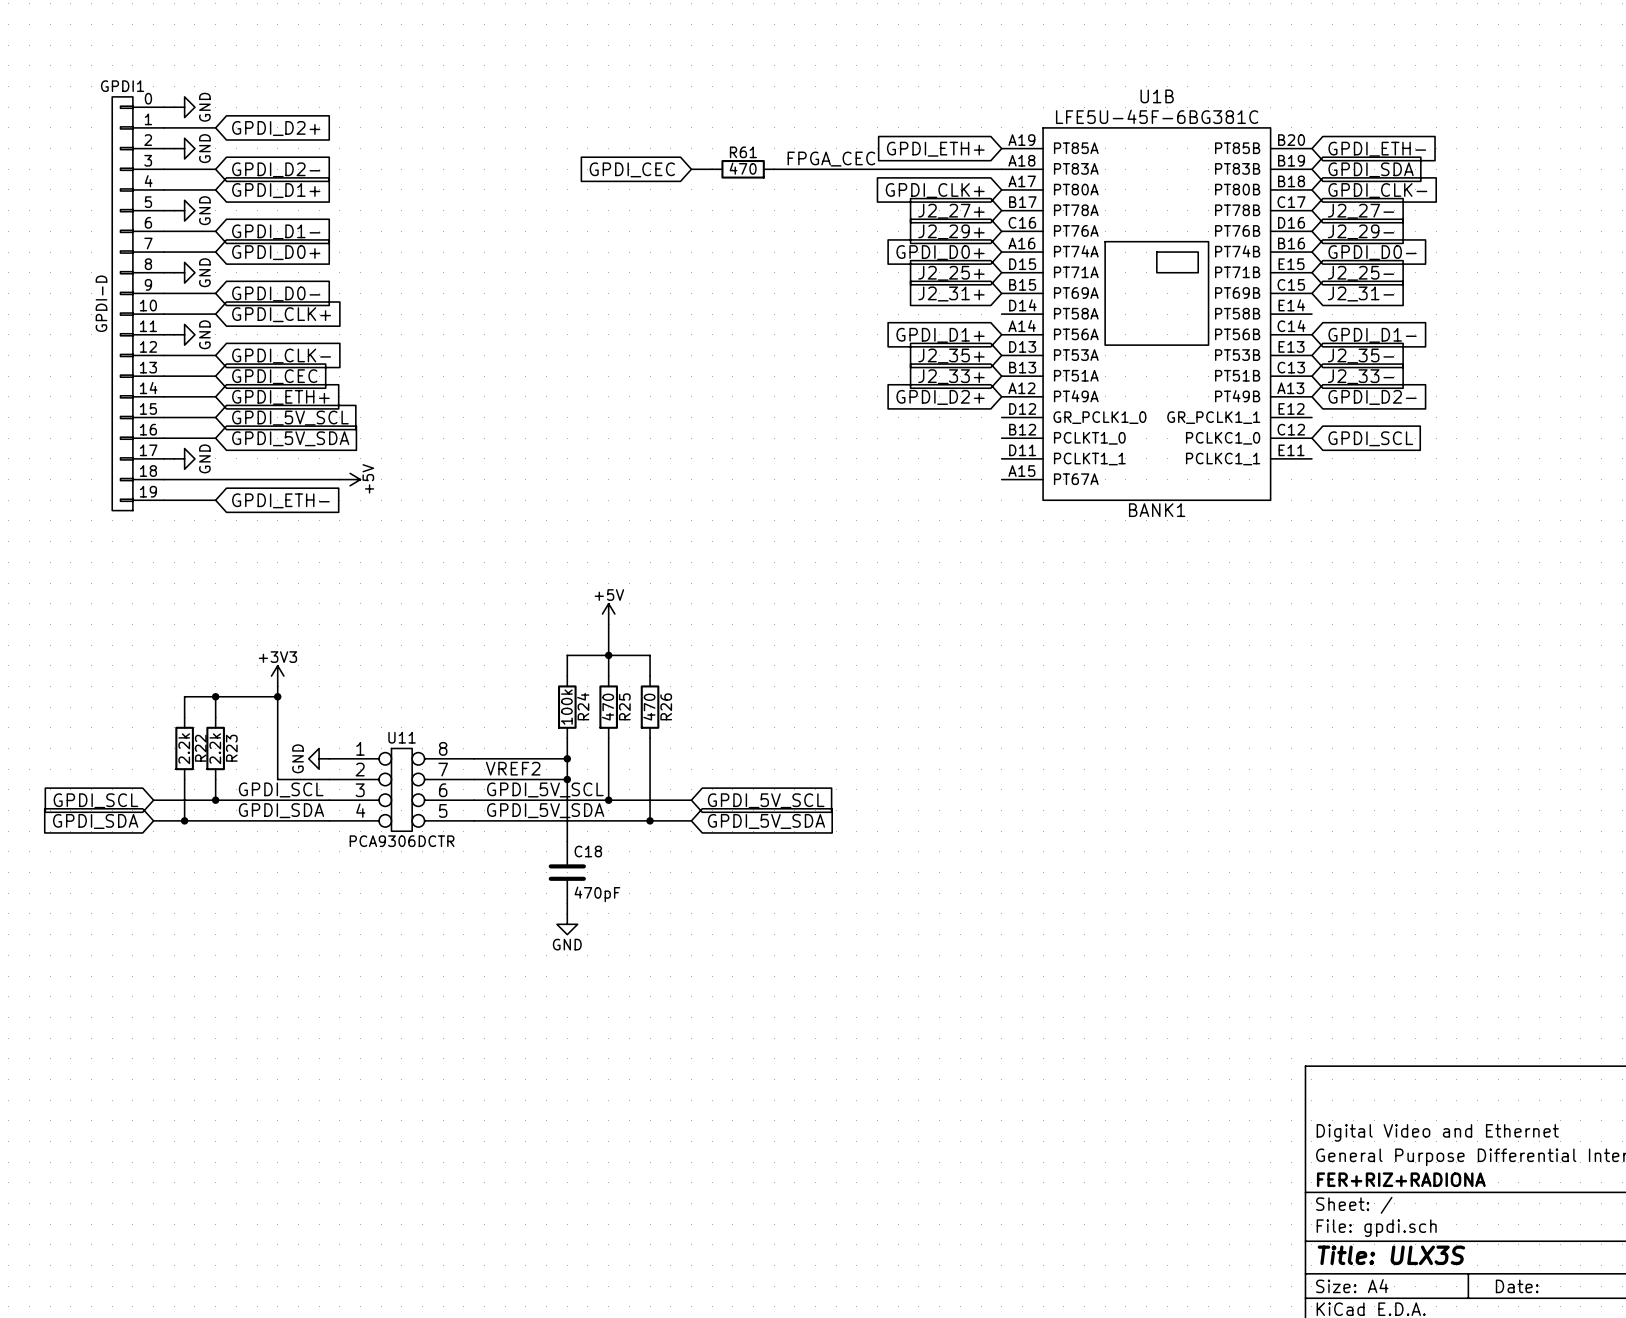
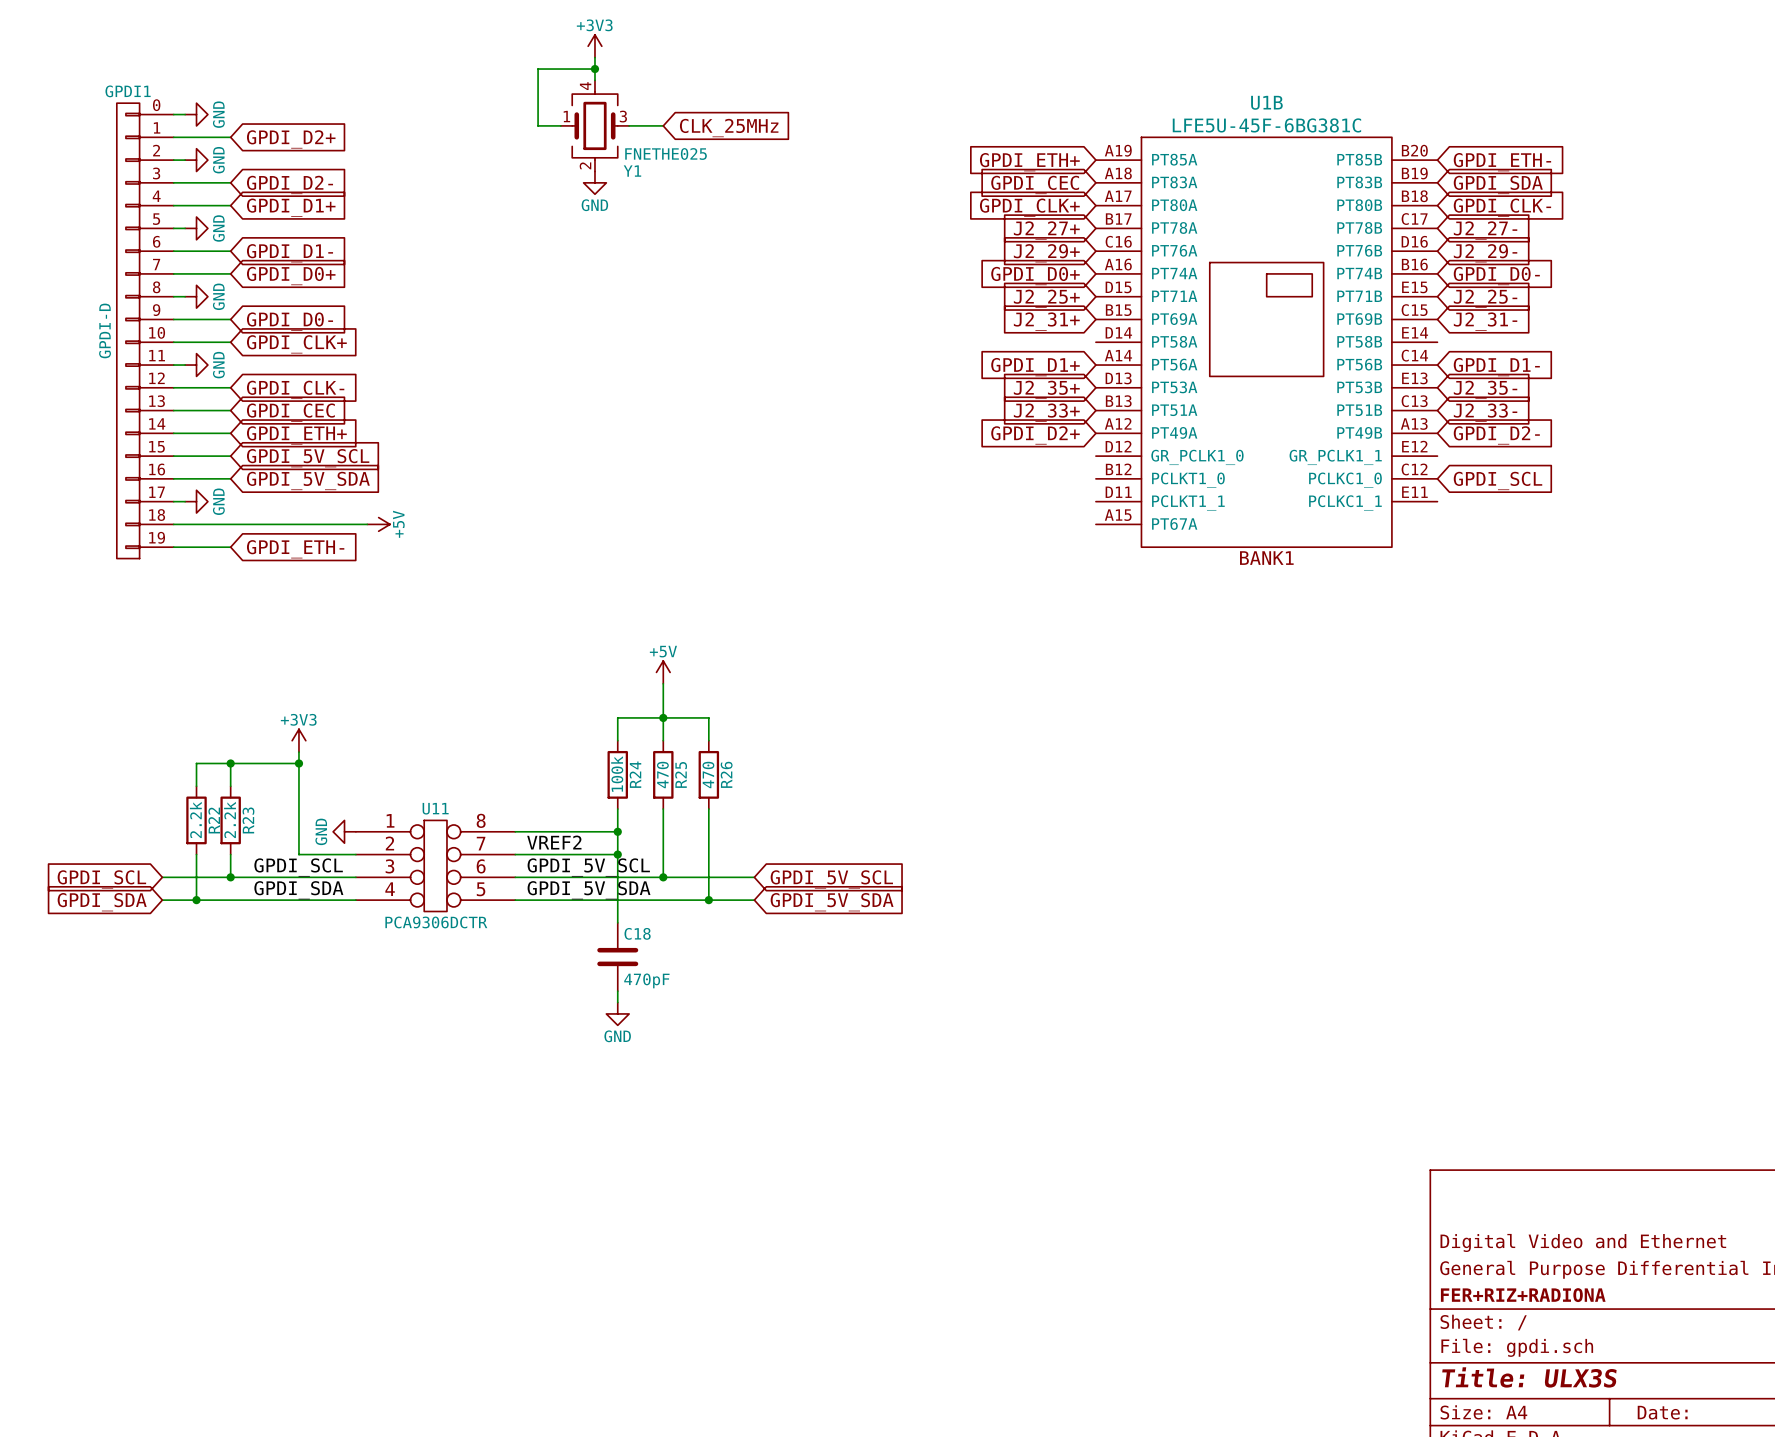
power symbol: none -> +3V3 (594, 46)
wire: none -> (594, 57) (594, 80)
wire: none -> (594, 69) (538, 69) (538, 125) (560, 125)
junction: none -> (594, 69)
Y1: none -> FNETHE025 (594, 125)
wire: none -> (629, 125) (663, 125)
global label: none -> CLK_25MHz (729, 128)
label: FPGA_CEC (831, 159) -> none
power symbol: none -> GND (594, 182)
global label: GPDI_CEC (632, 169) -> none
wire: (691, 169) (712, 169) -> none
R61: 470 (743, 169) -> none
wire: (774, 169) (1001, 169) -> none
global label: none -> GPDI_CEC (1035, 184)

